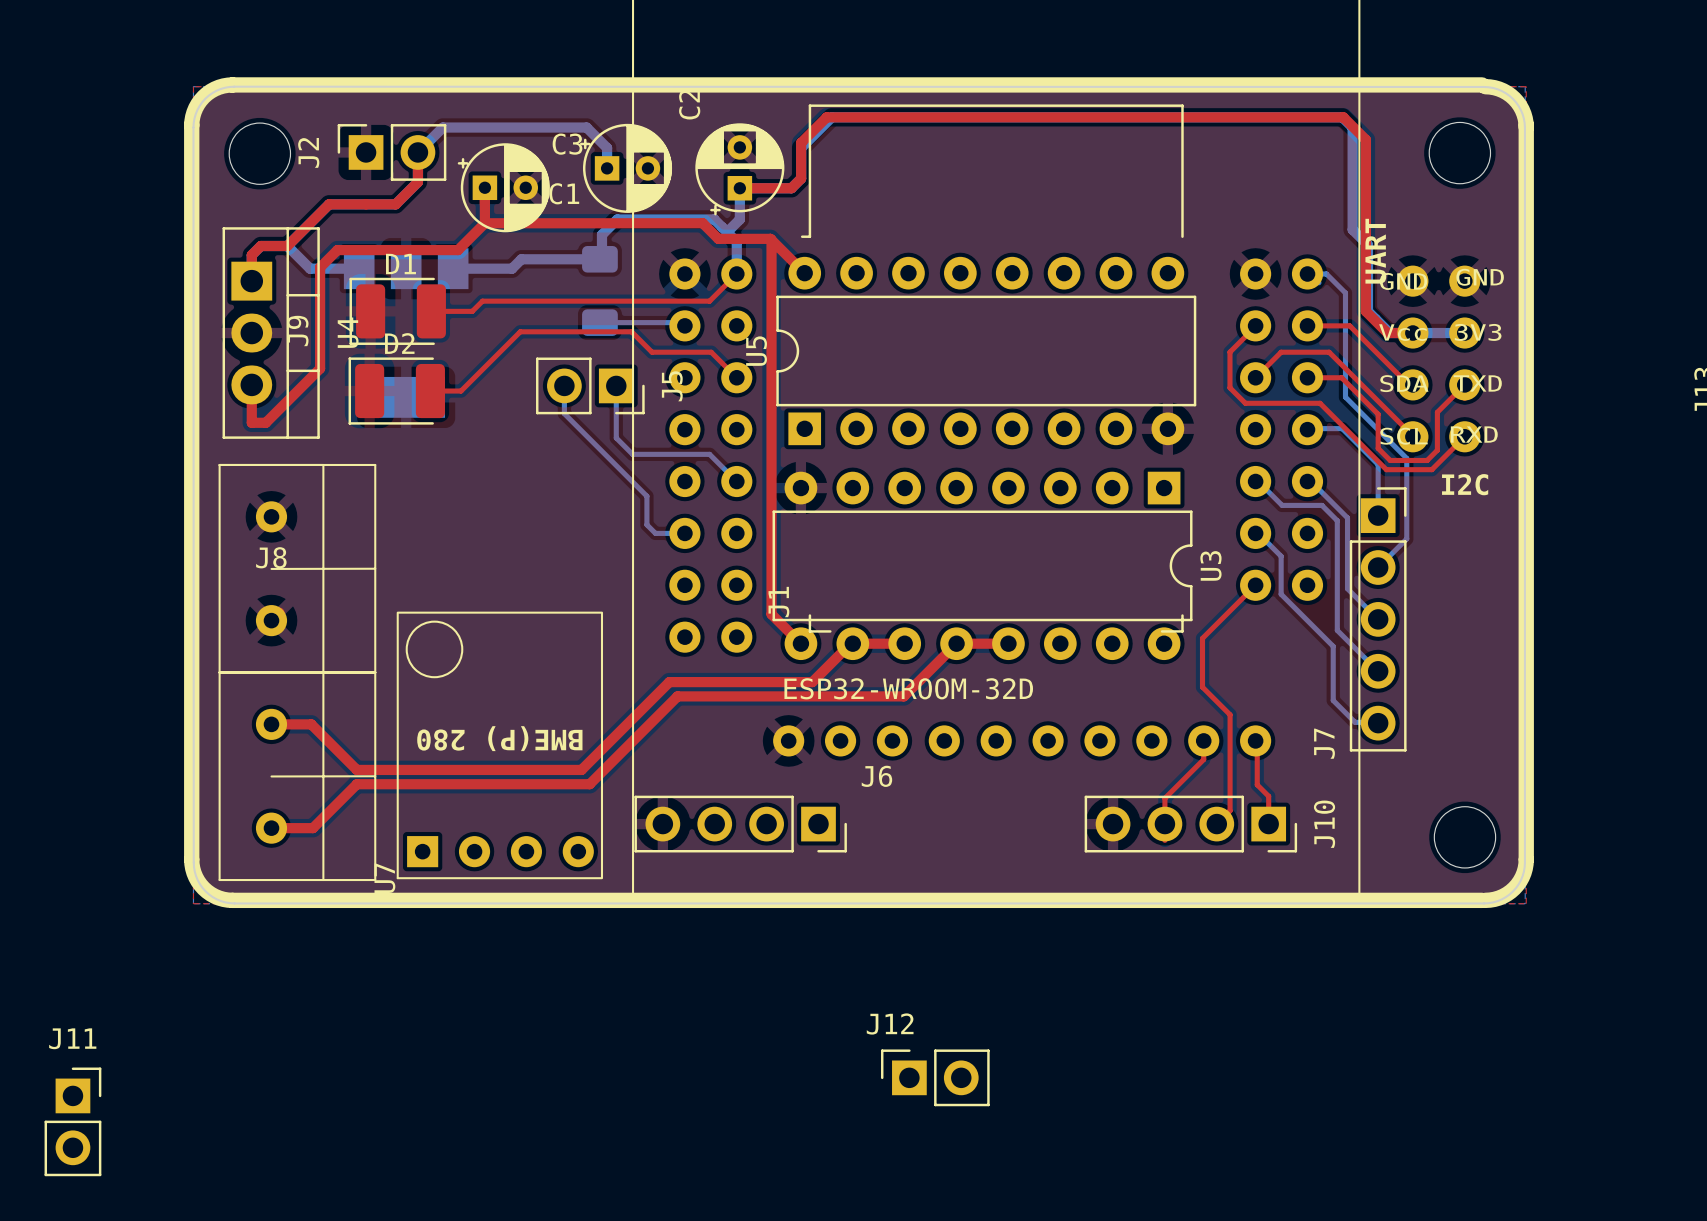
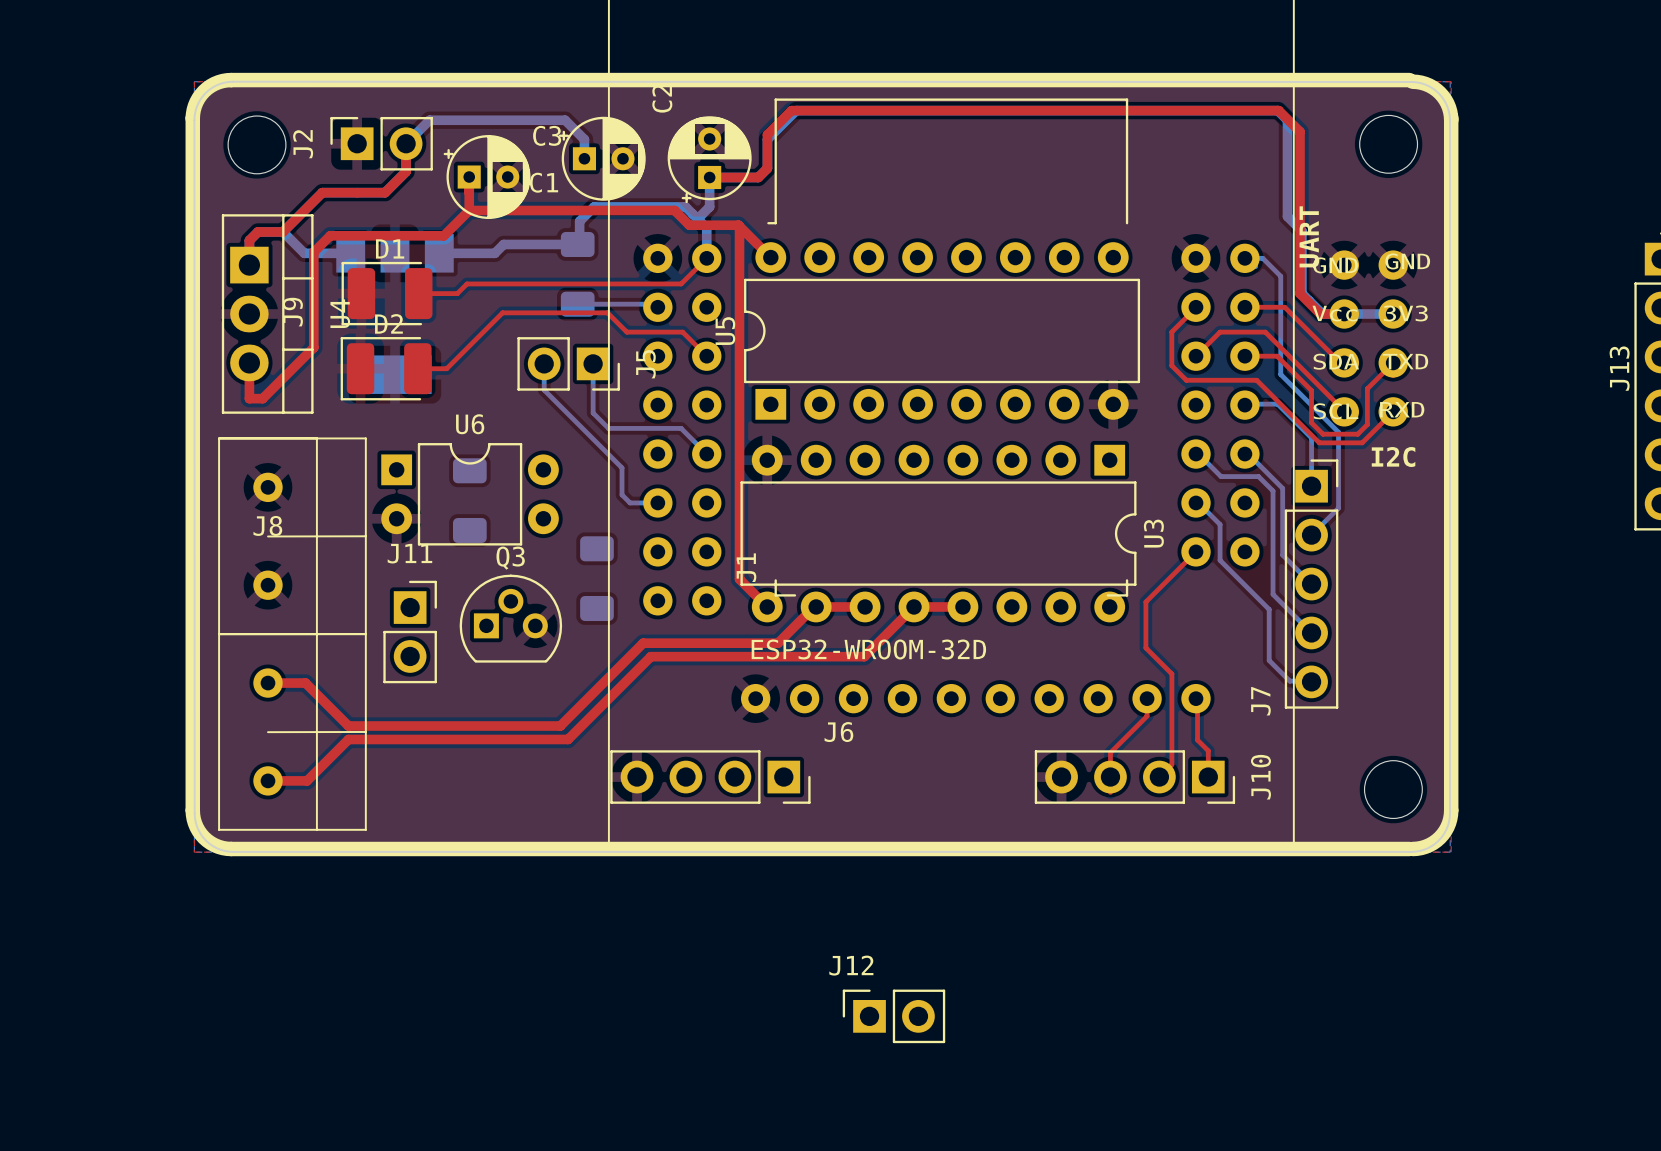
U6: none -> (470, 494)
part: none -> (469, 500)
part: none -> (596, 578)
Q3: none -> (510, 618)
U7: (499, 745) -> none
J11 position: (72, 1121) -> (410, 632)

